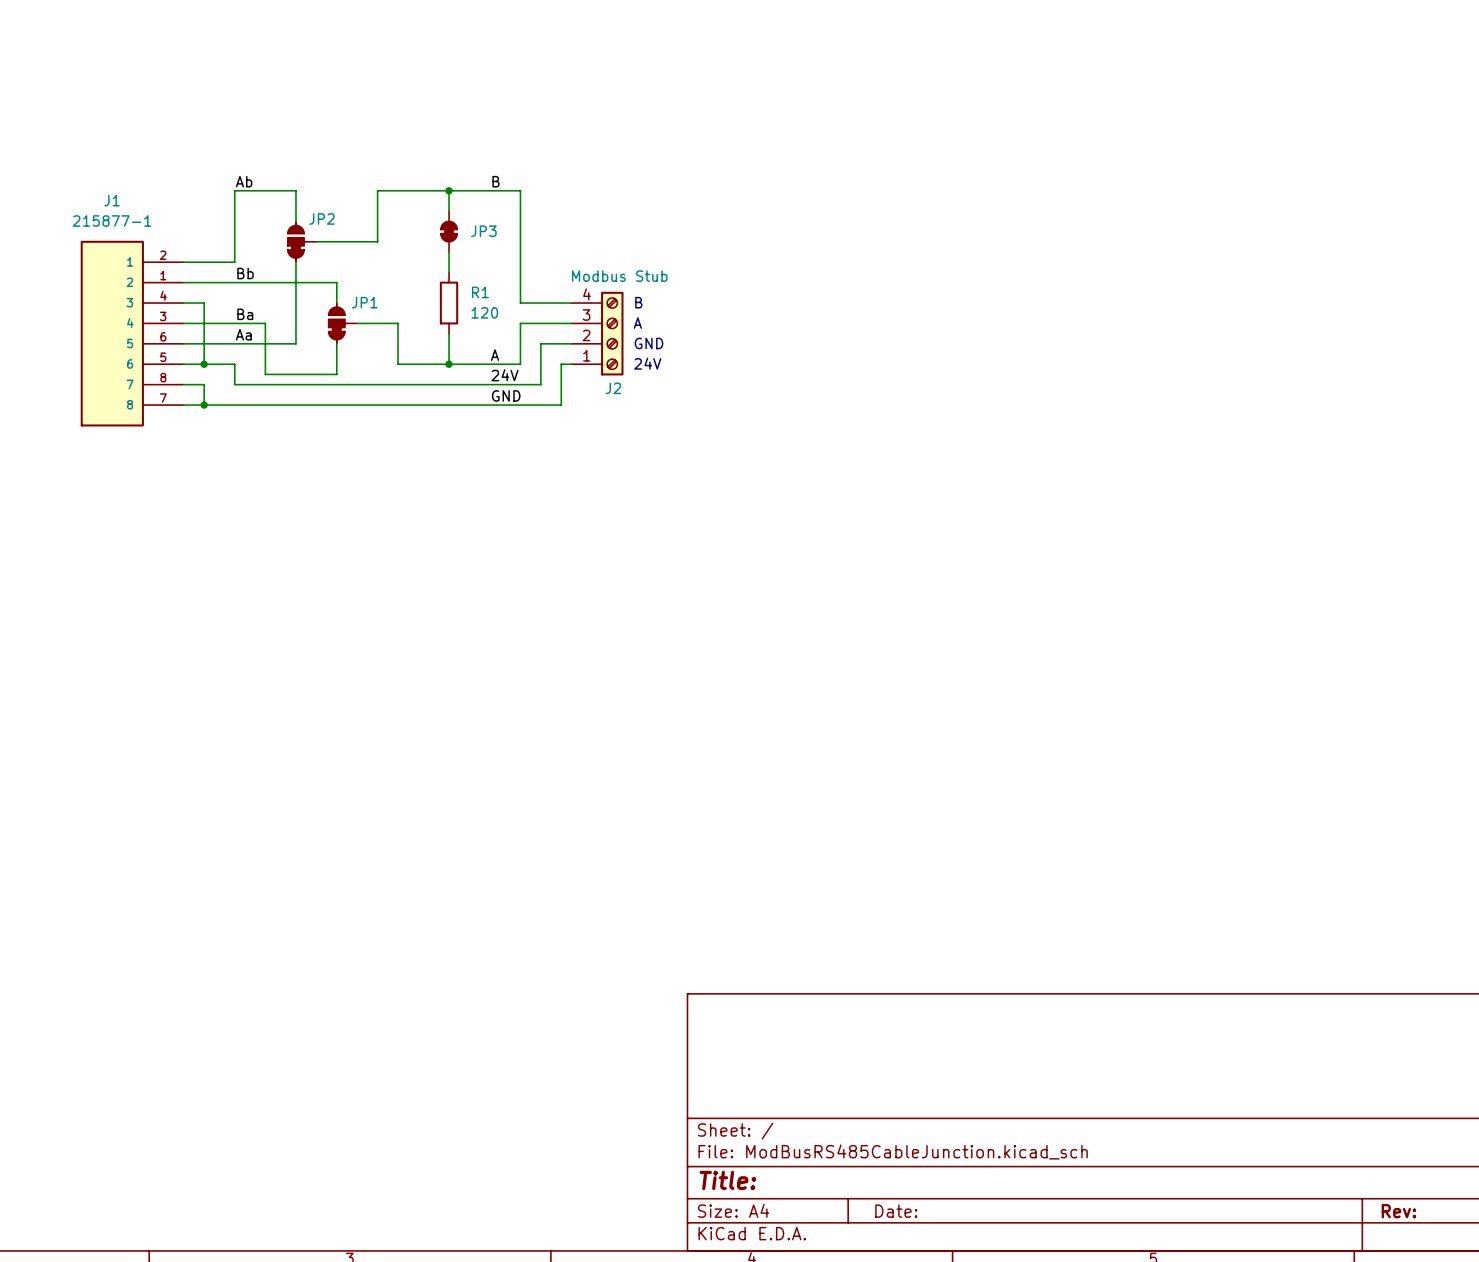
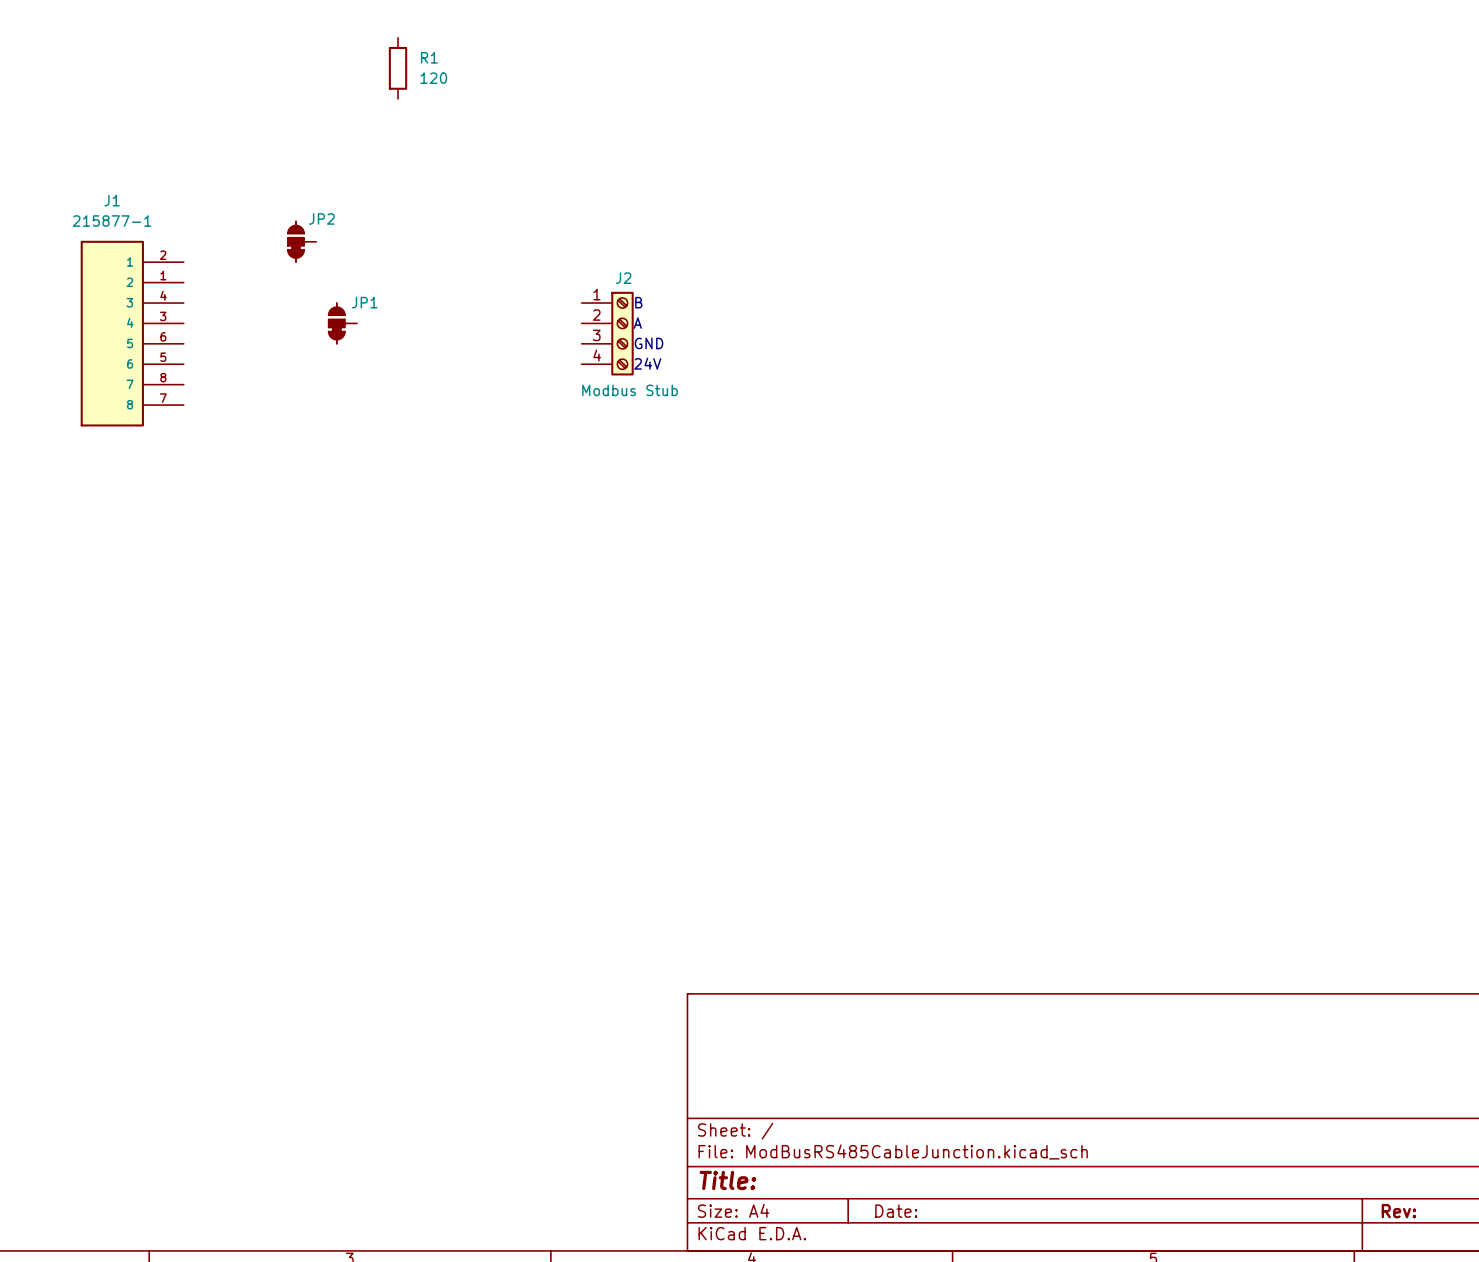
label: Ab (244, 181) -> none
label: B (495, 181) -> none
wire: (449, 190) (449, 211) -> none
junction: (449, 190) -> none
wire: (295, 221) (295, 190) (234, 190) (234, 262) (183, 262) -> none
JP3: (449, 231) -> none
wire: (316, 241) (377, 241) (377, 190) (520, 190) (520, 303) (571, 303) -> none
wire: (449, 252) (449, 272) -> none
wire: (295, 262) (295, 343) (183, 343) -> none
label: Bb (245, 273) -> none
wire: (183, 282) (336, 282) (336, 303) -> none
wire: (183, 303) (204, 303) (204, 364) -> none
R1 position: (449, 303) -> (398, 68)
label: Ba (245, 314) -> none
wire: (183, 323) (265, 323) (265, 374) (336, 374) (336, 343) -> none
wire: (357, 323) (398, 323) (398, 364) (520, 364) (520, 323) (571, 323) -> none
wire: (449, 333) (449, 364) -> none
J2 flip: as is (612, 333) -> up-down (622, 333)
label: Aa (243, 334) -> none
wire: (571, 343) (540, 343) (540, 384) (234, 384) (234, 364) (183, 364) -> none
label: A (495, 355) -> none
junction: (204, 364) -> none
junction: (449, 364) -> none
wire: (571, 364) (561, 364) (561, 405) (183, 405) -> none
label: 24V (504, 375) -> none
wire: (183, 384) (204, 384) (204, 405) -> none
label: GND (506, 395) -> none
junction: (204, 405) -> none

